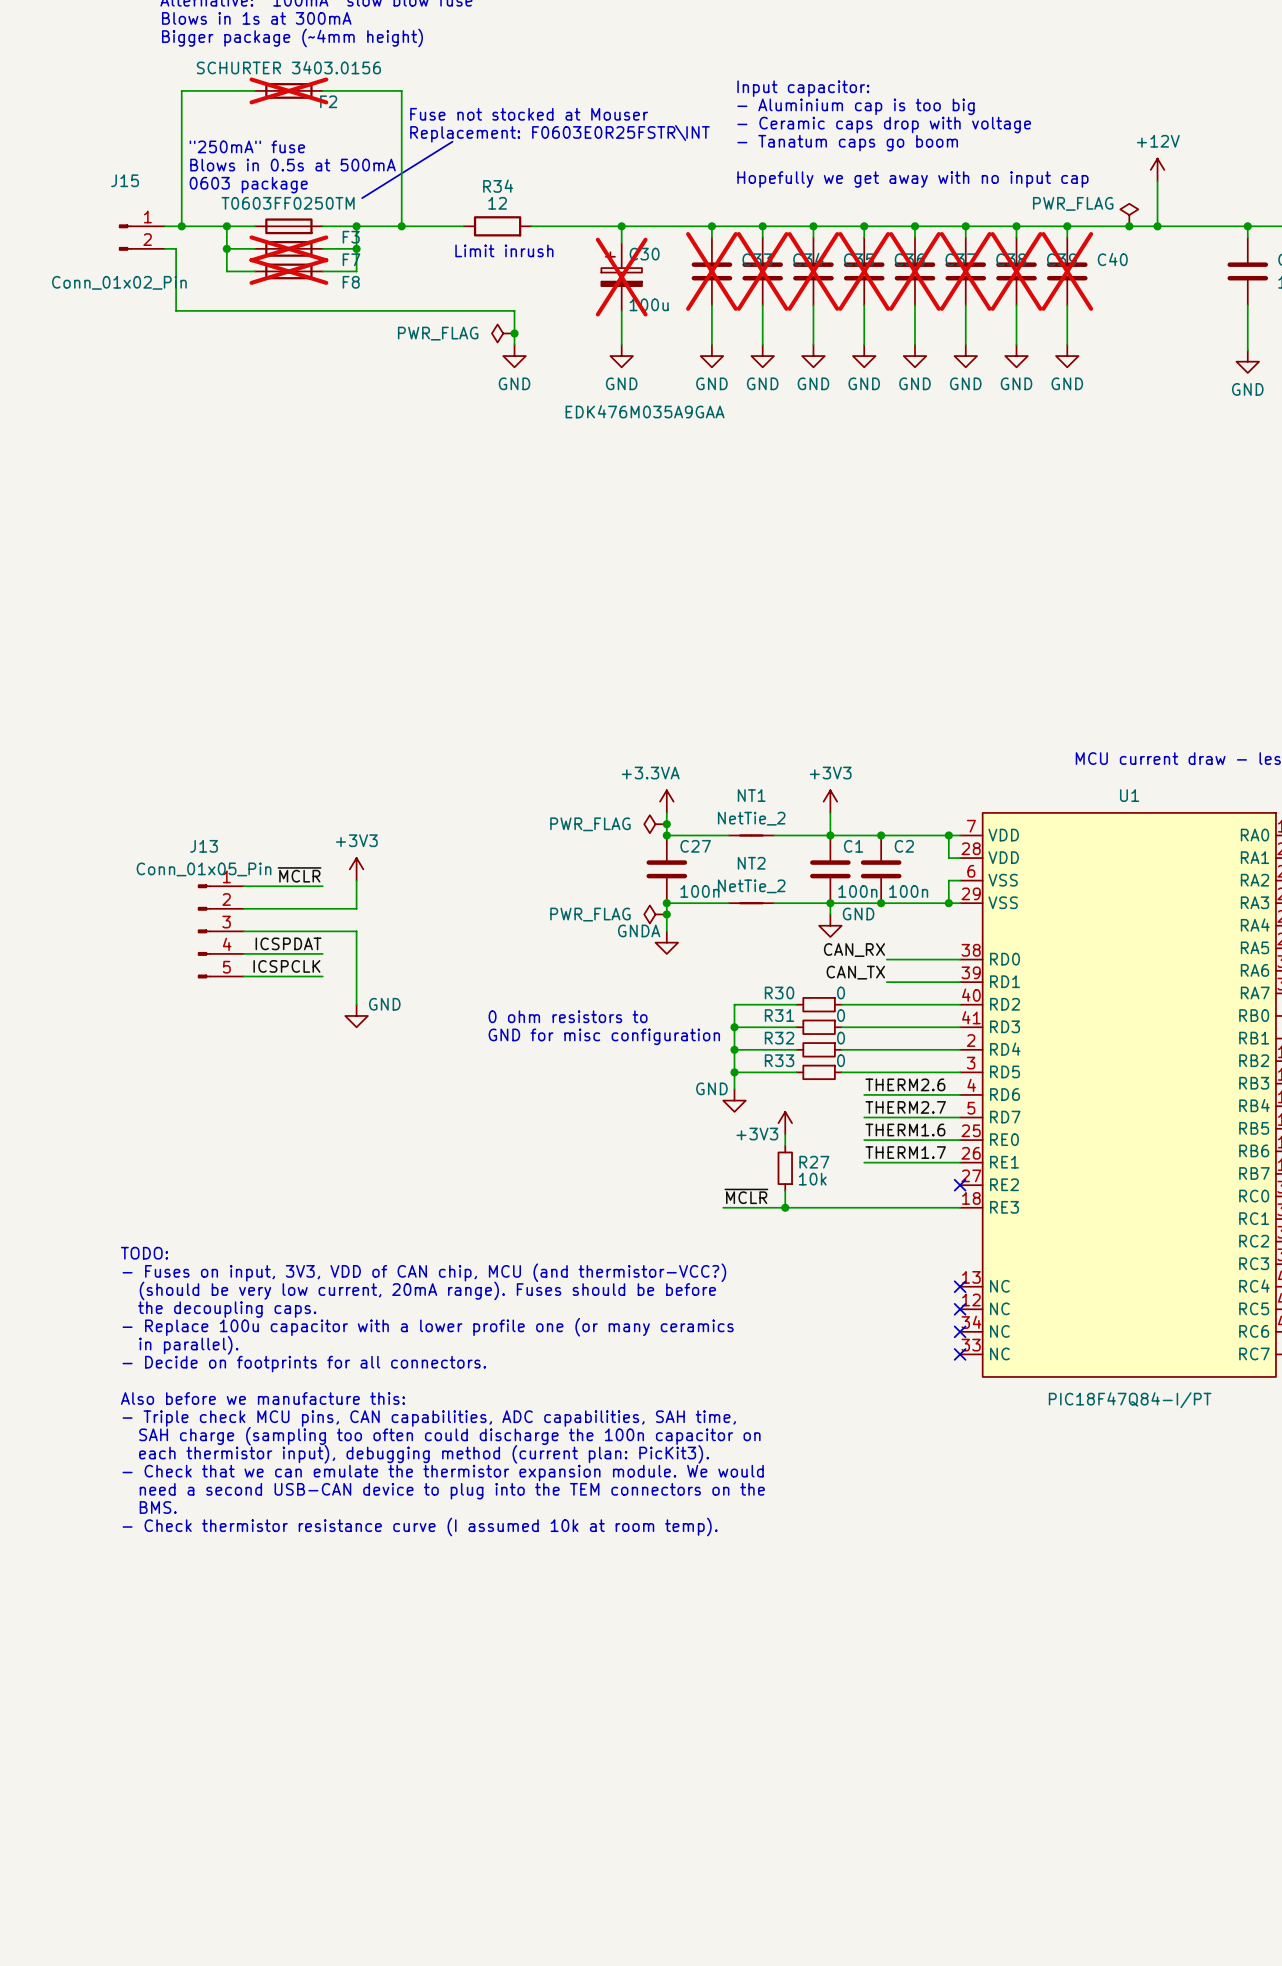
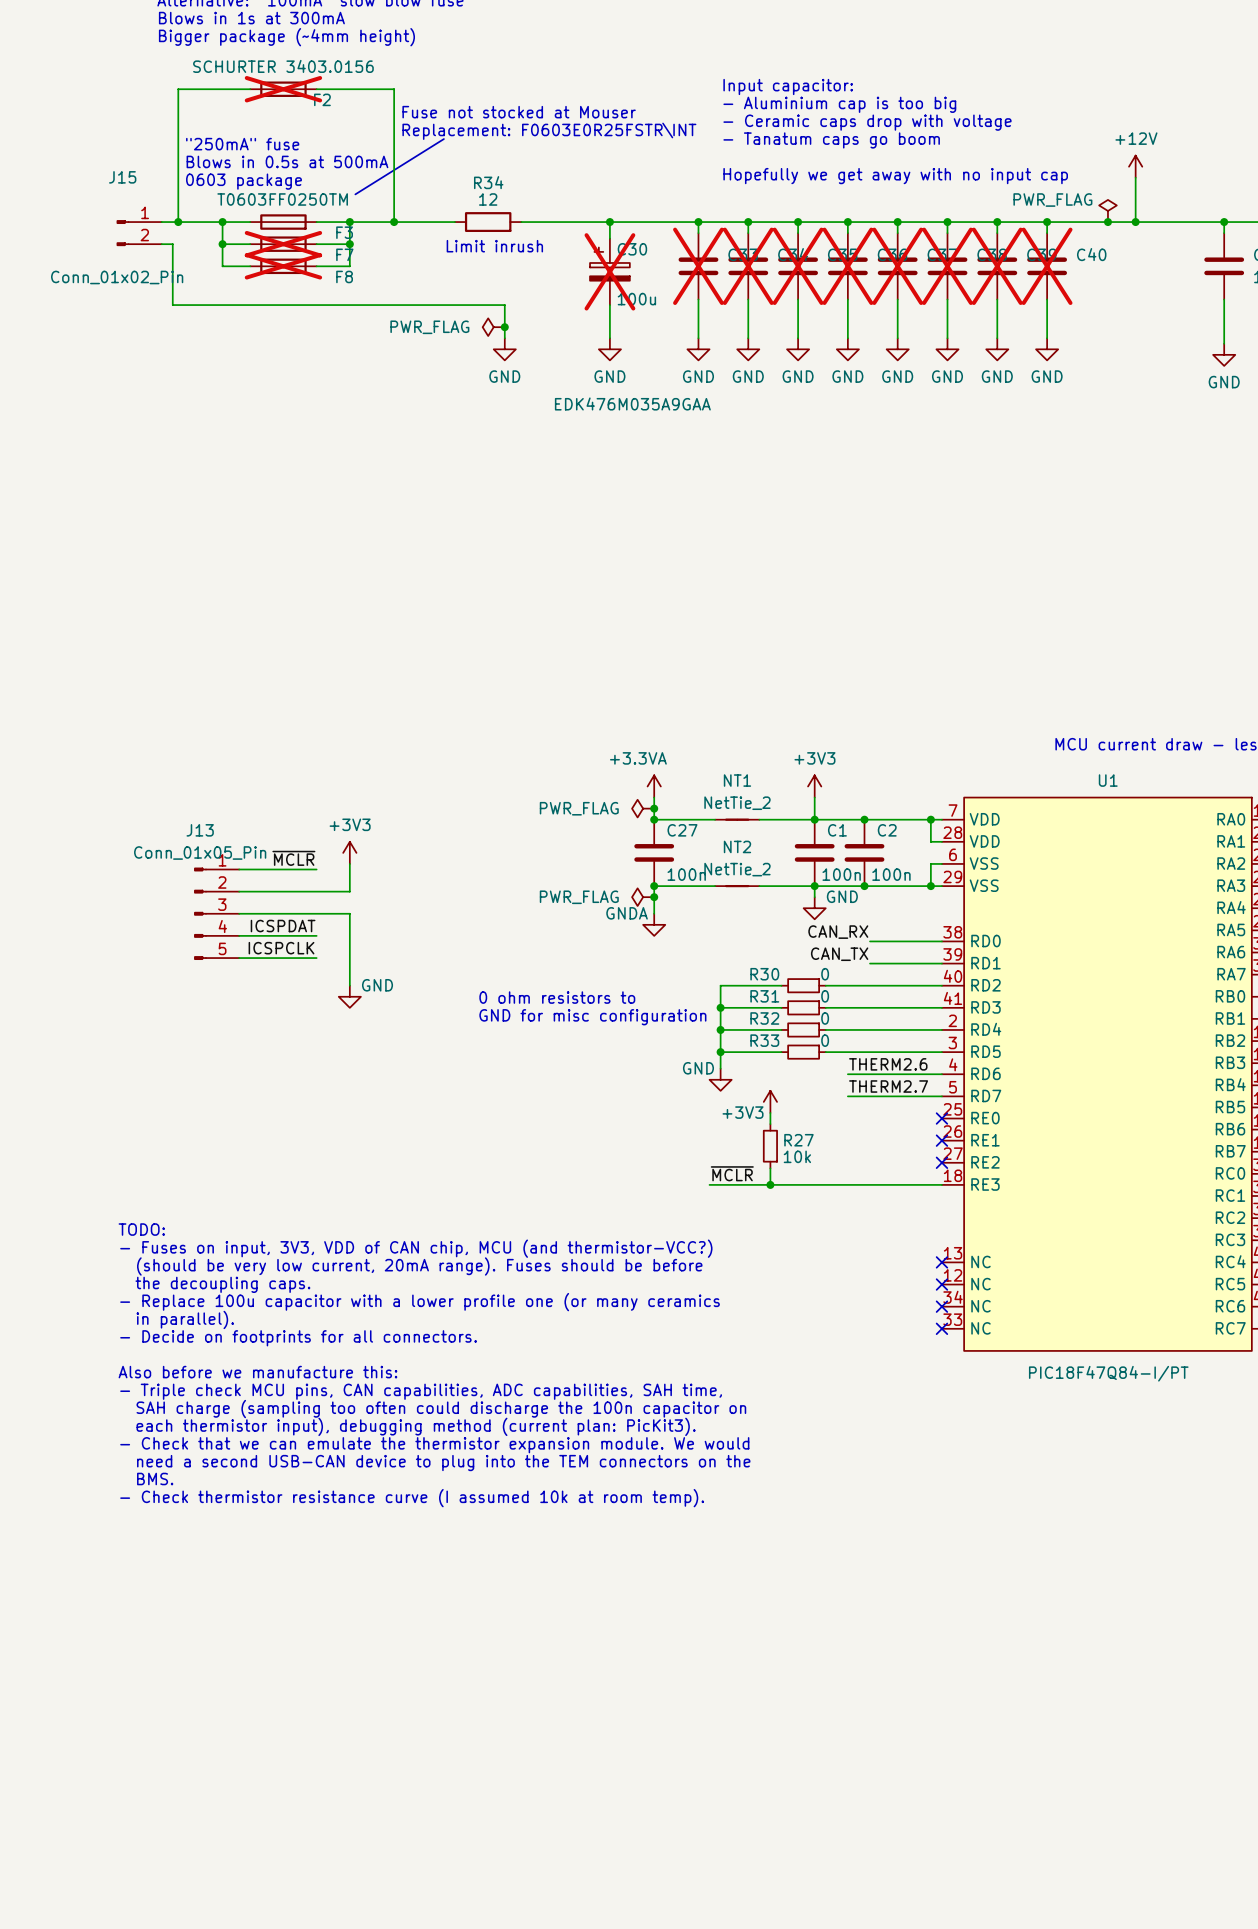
label: THERM1.6 (905, 1130) -> none
wire: (864, 1140) (960, 1140) -> none
no-connect mark: none -> (941, 1118)
label: THERM1.7 (905, 1152) -> none
wire: (864, 1162) (960, 1162) -> none
no-connect mark: none -> (941, 1140)

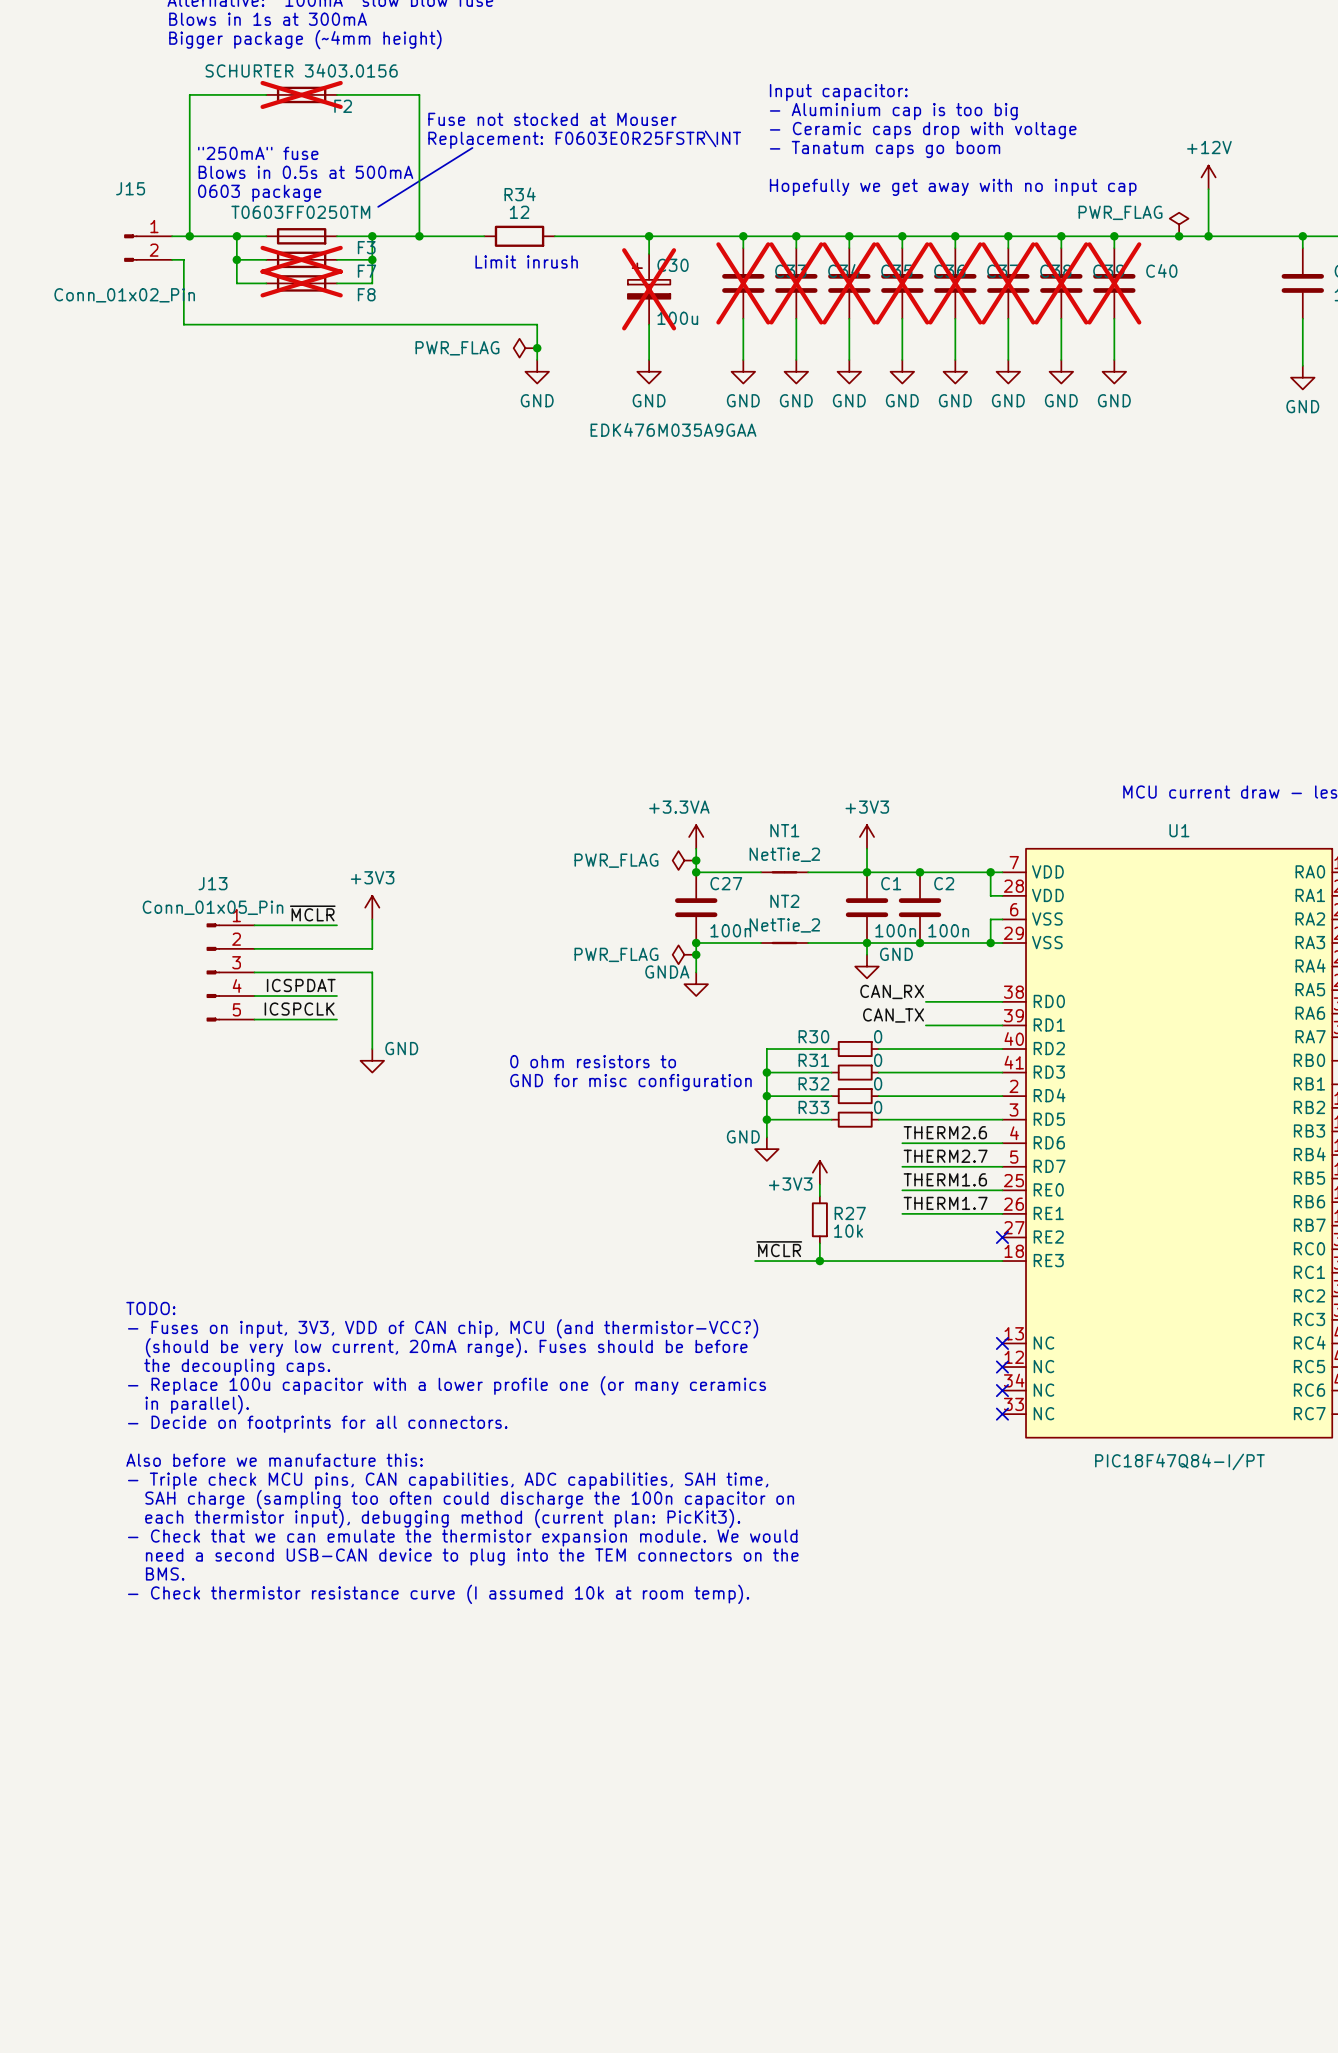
label: none -> THERM1.6 (945, 1179)
wire: none -> (902, 1190) (1002, 1190)
no-connect mark: (941, 1118) -> none
label: none -> THERM1.7 (945, 1203)
wire: none -> (902, 1213) (1002, 1213)
no-connect mark: (941, 1140) -> none

